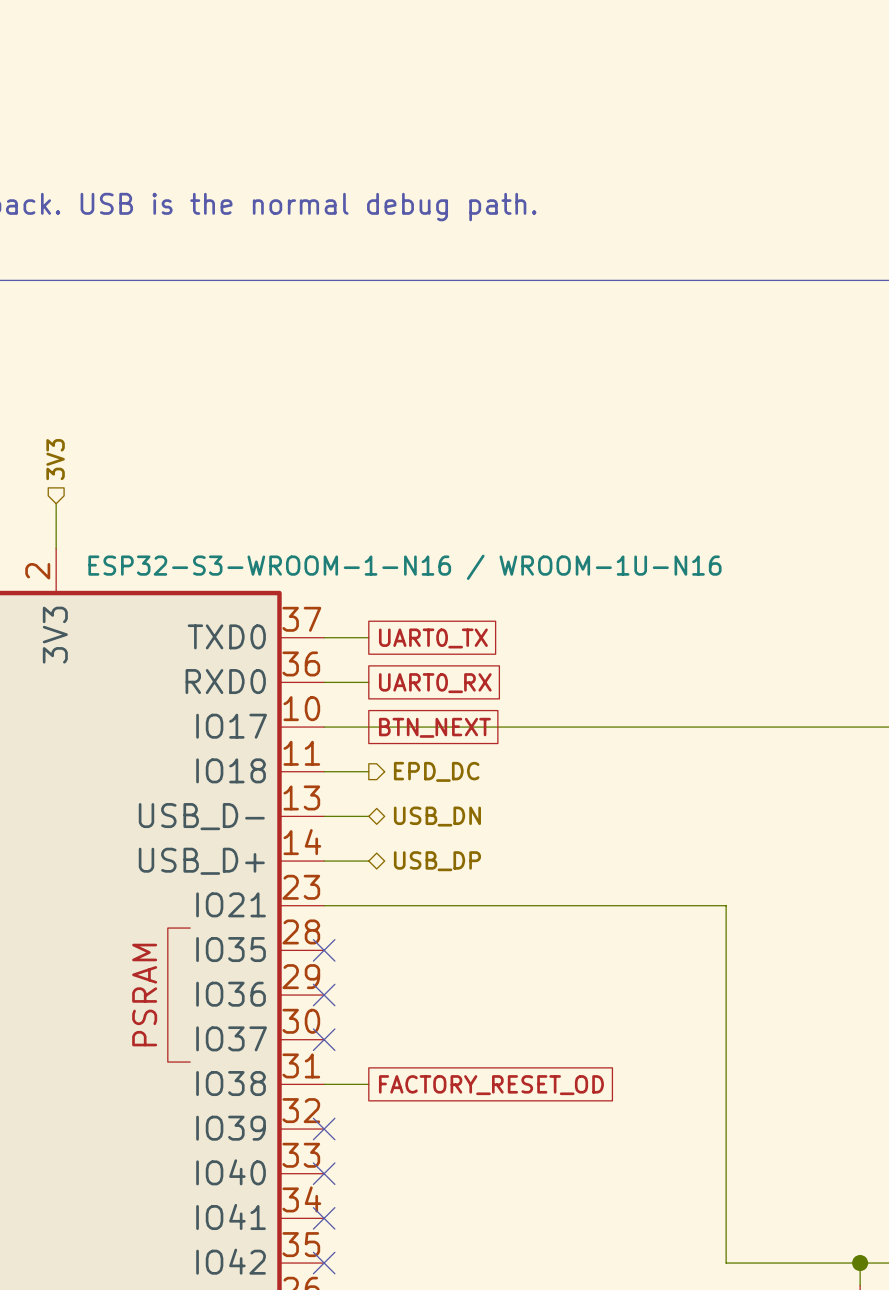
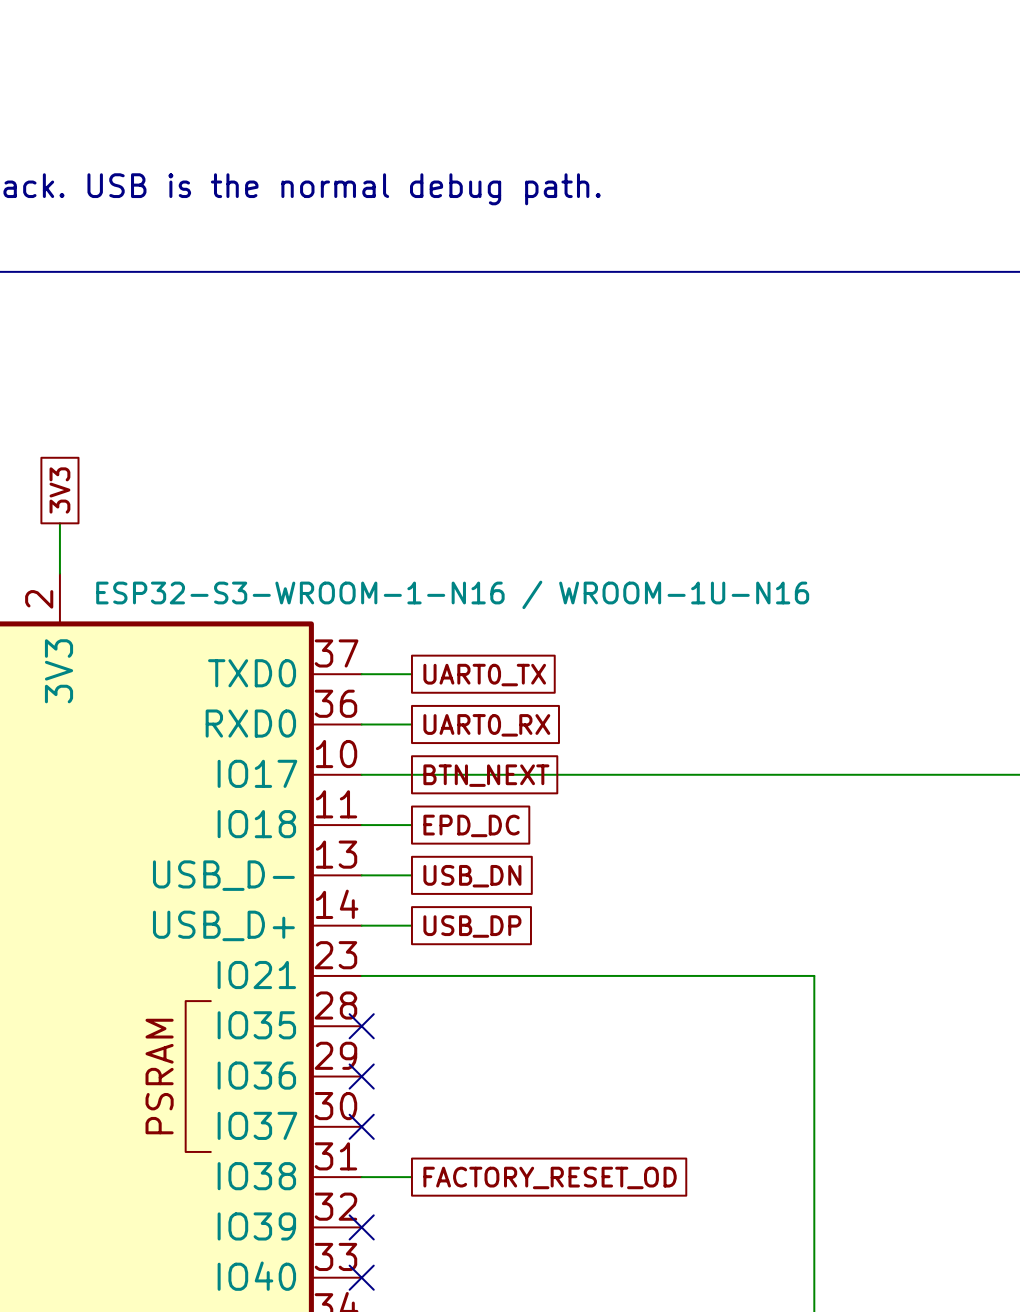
hierarchical label: 3V3 (55, 459) -> none
global label: none -> 3V3 (59, 490)
hierarchical label: EPD_DC (436, 771) -> none
global label: none -> EPD_DC (471, 825)
hierarchical label: USB_DN (437, 816) -> none
global label: none -> USB_DN (472, 876)
global label: none -> USB_DP (472, 926)
hierarchical label: USB_DP (437, 861) -> none

